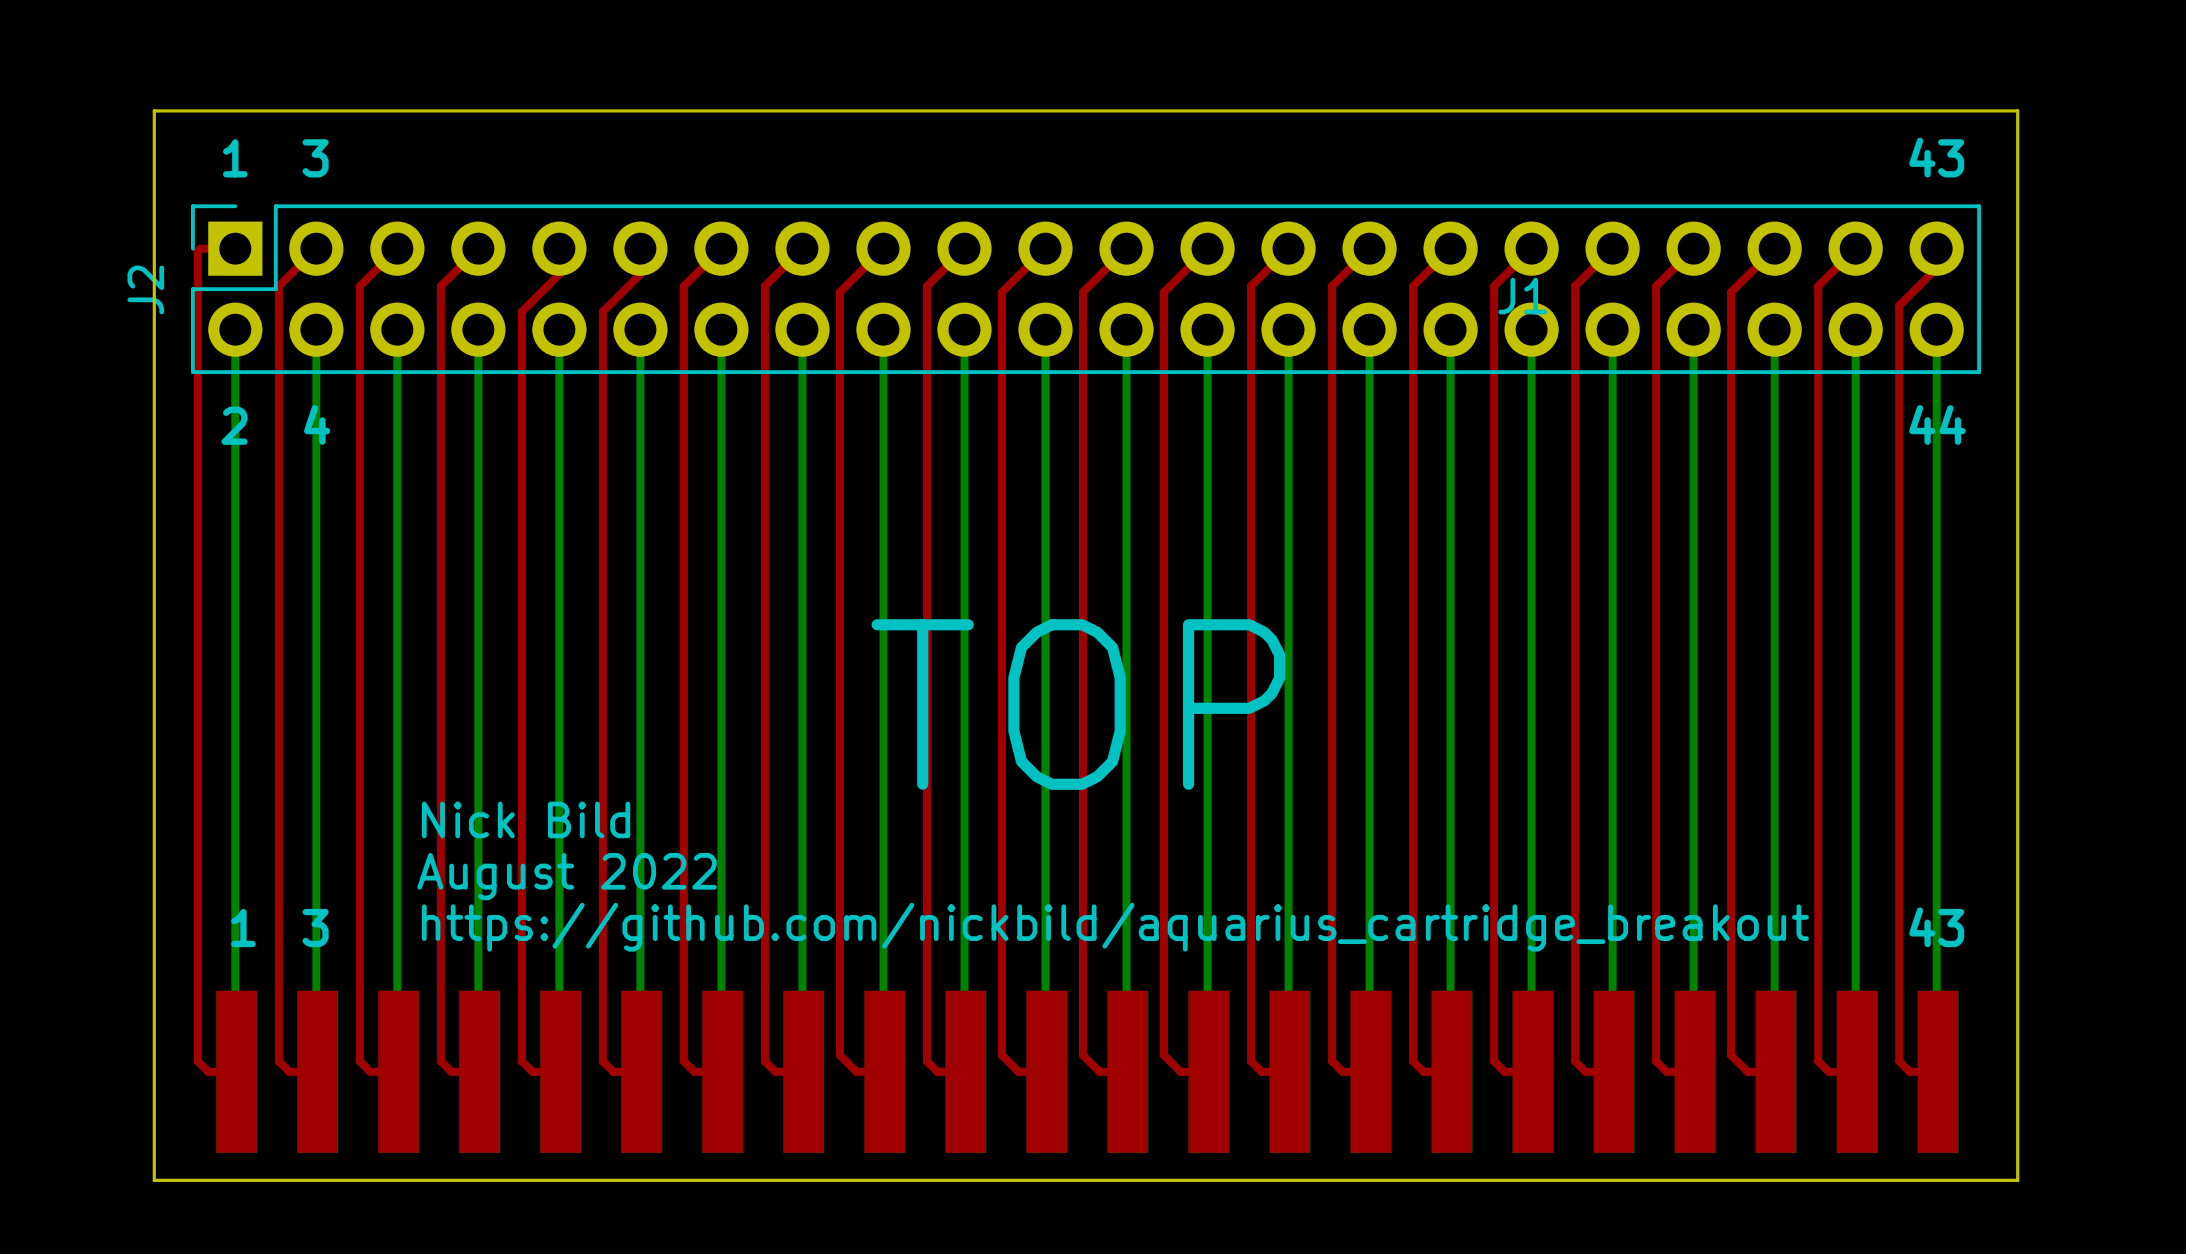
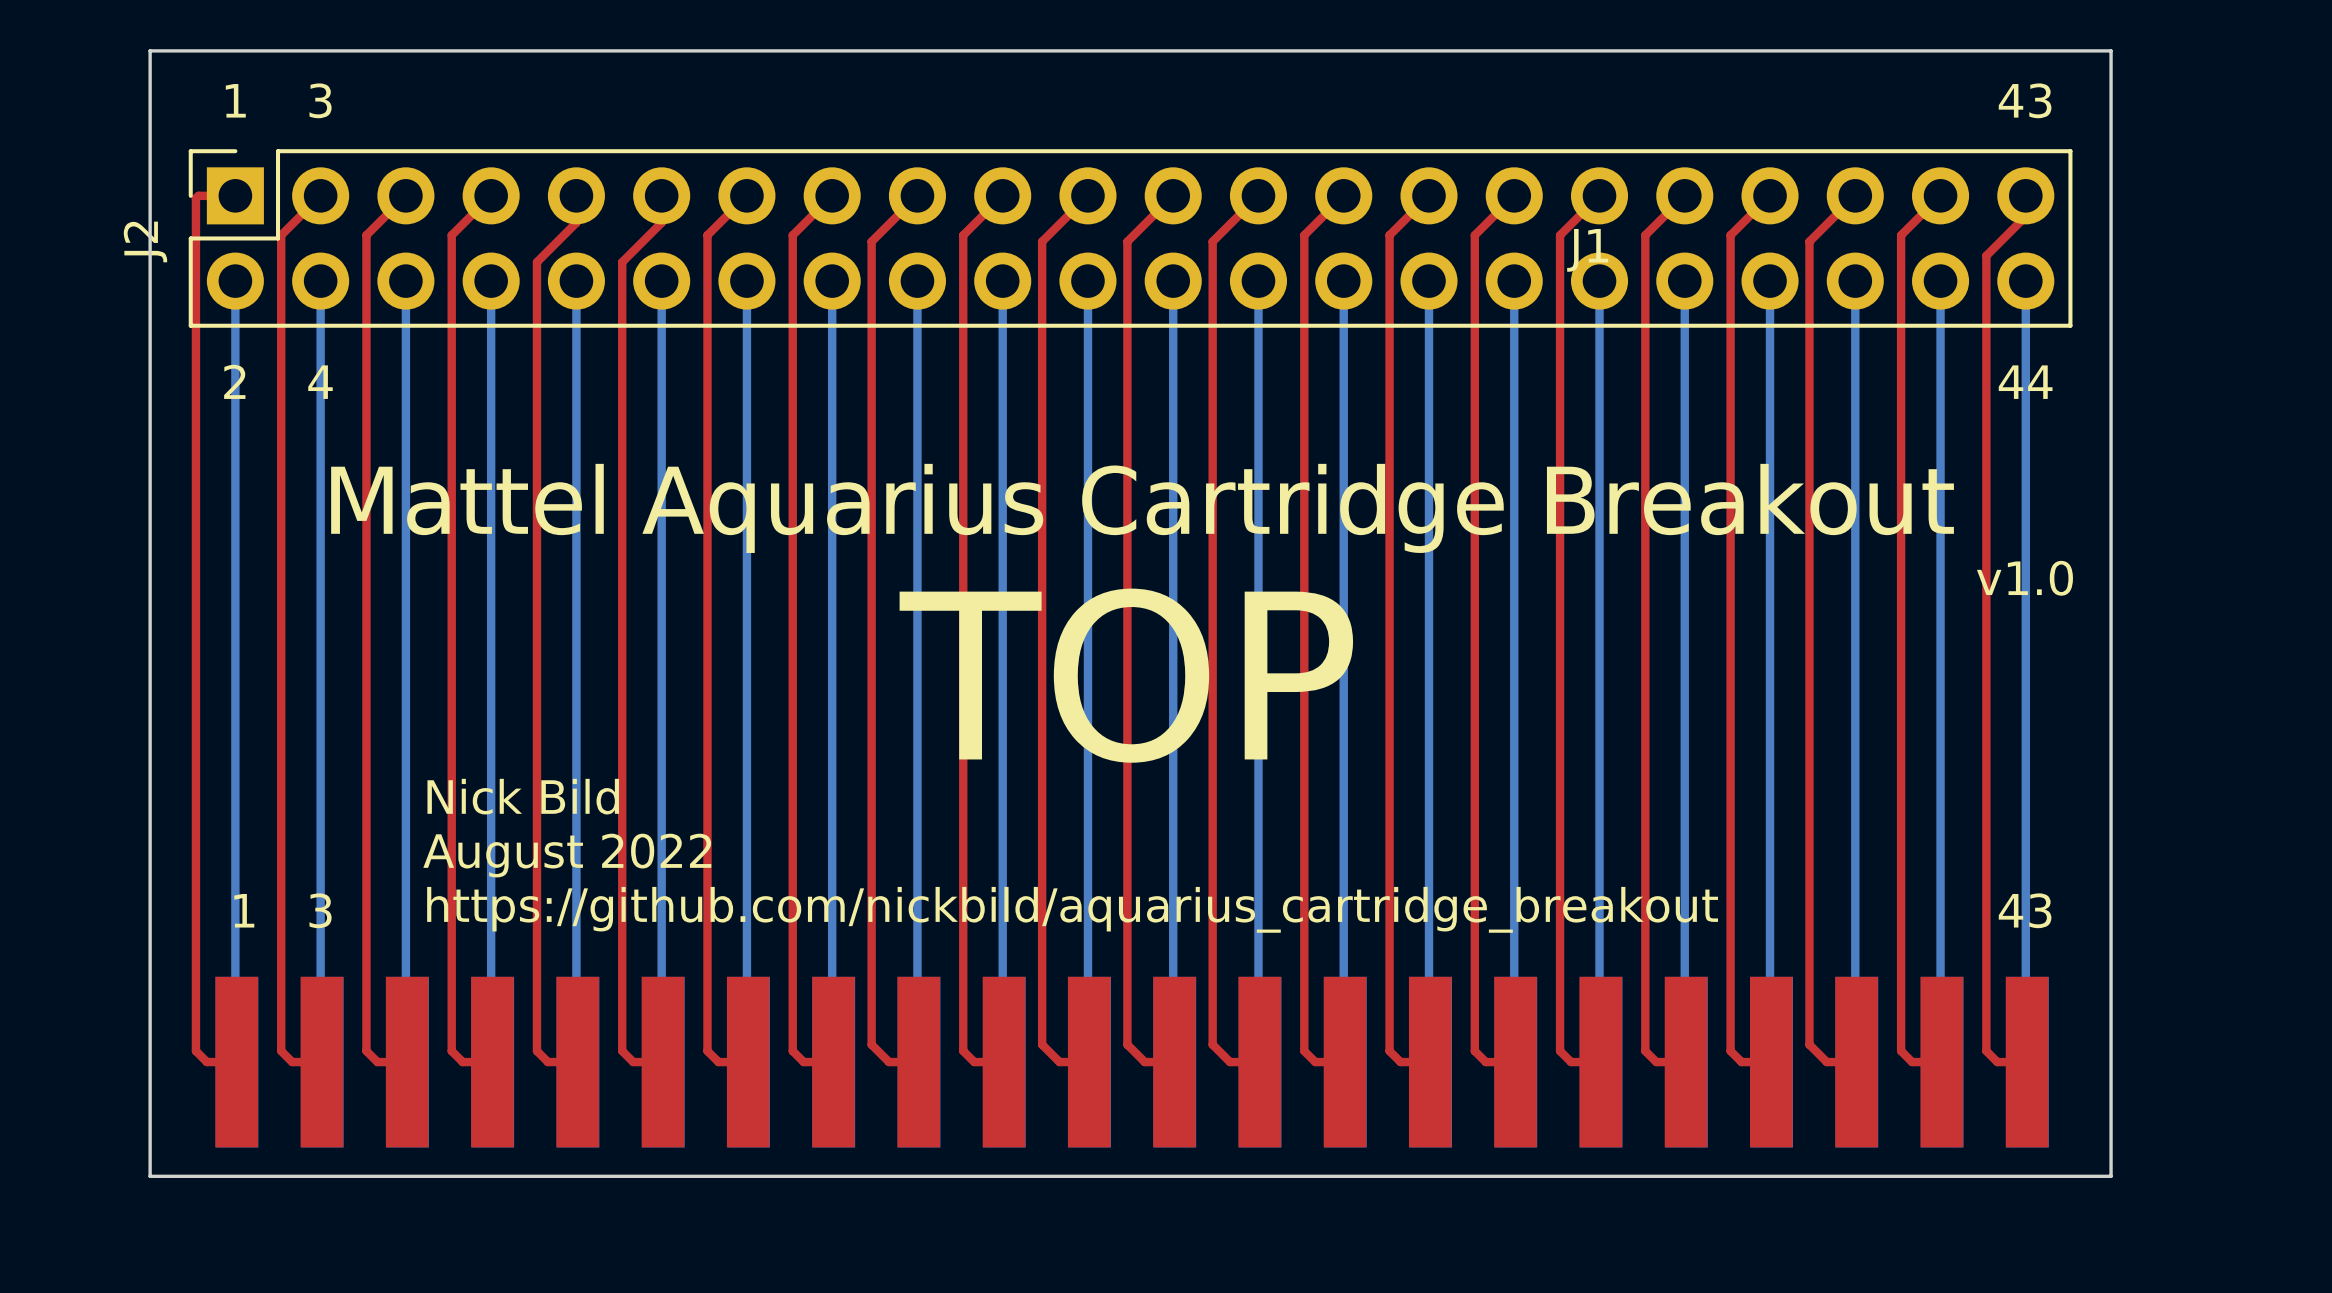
text: none -> Mattel Aquarius Cartridge Breakout (1142, 508)
text: none -> v1.0 (2024, 578)

